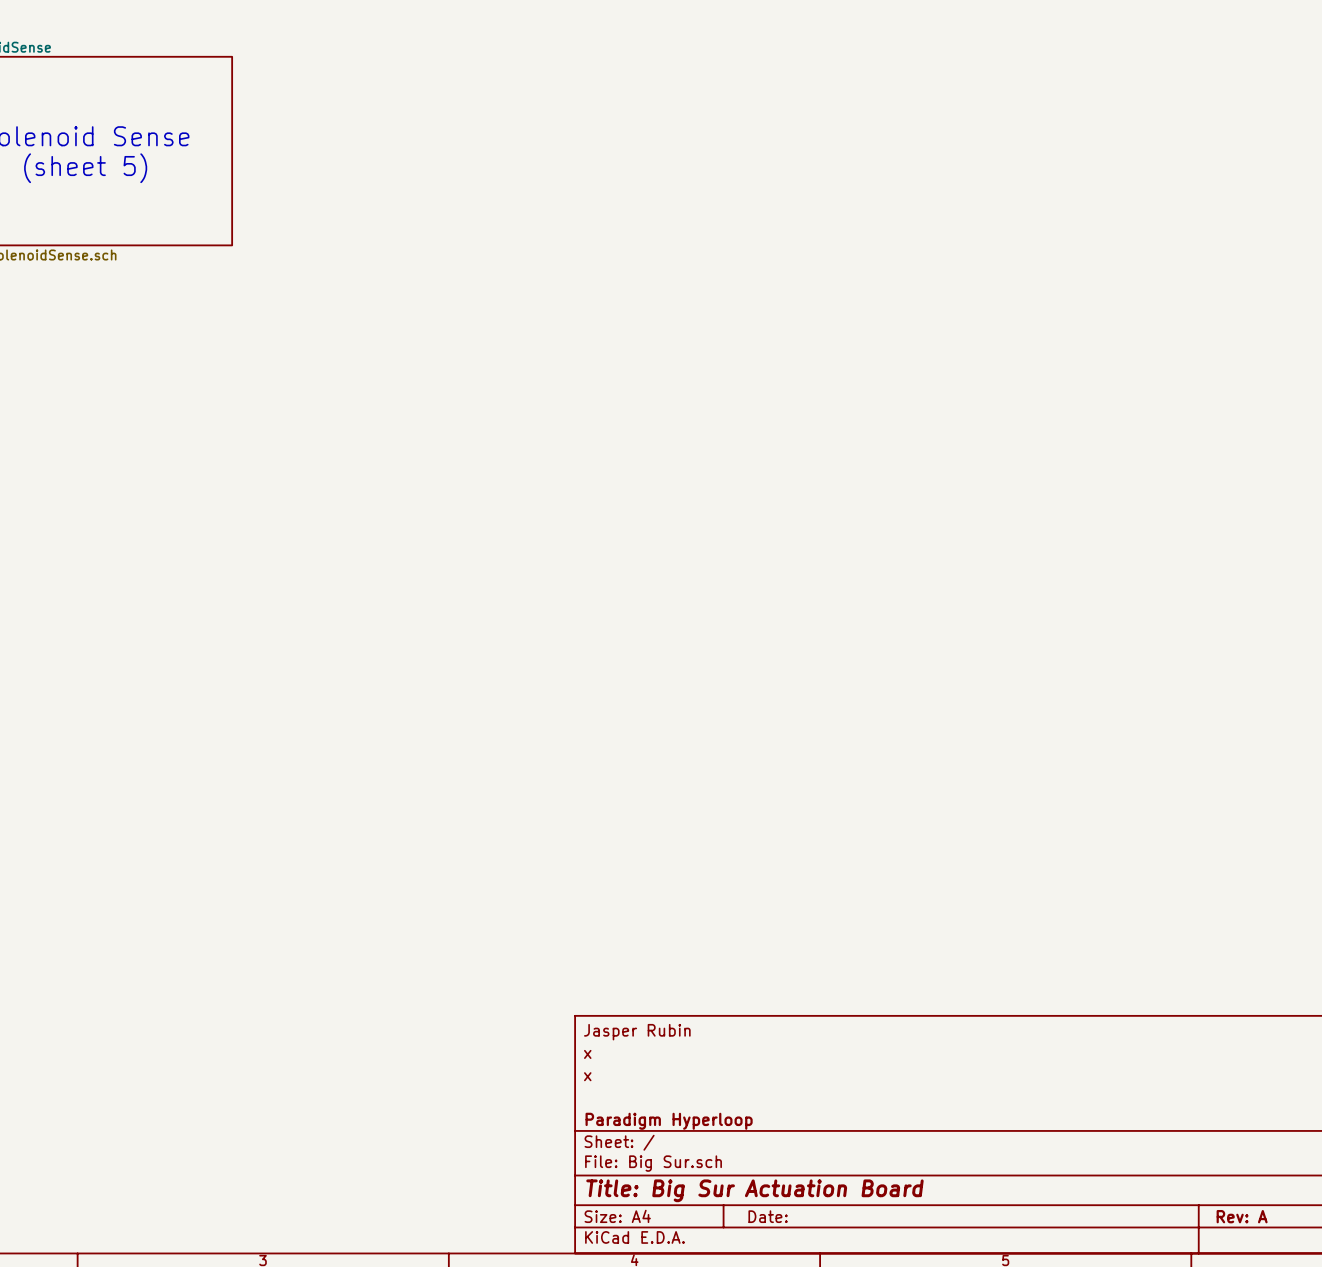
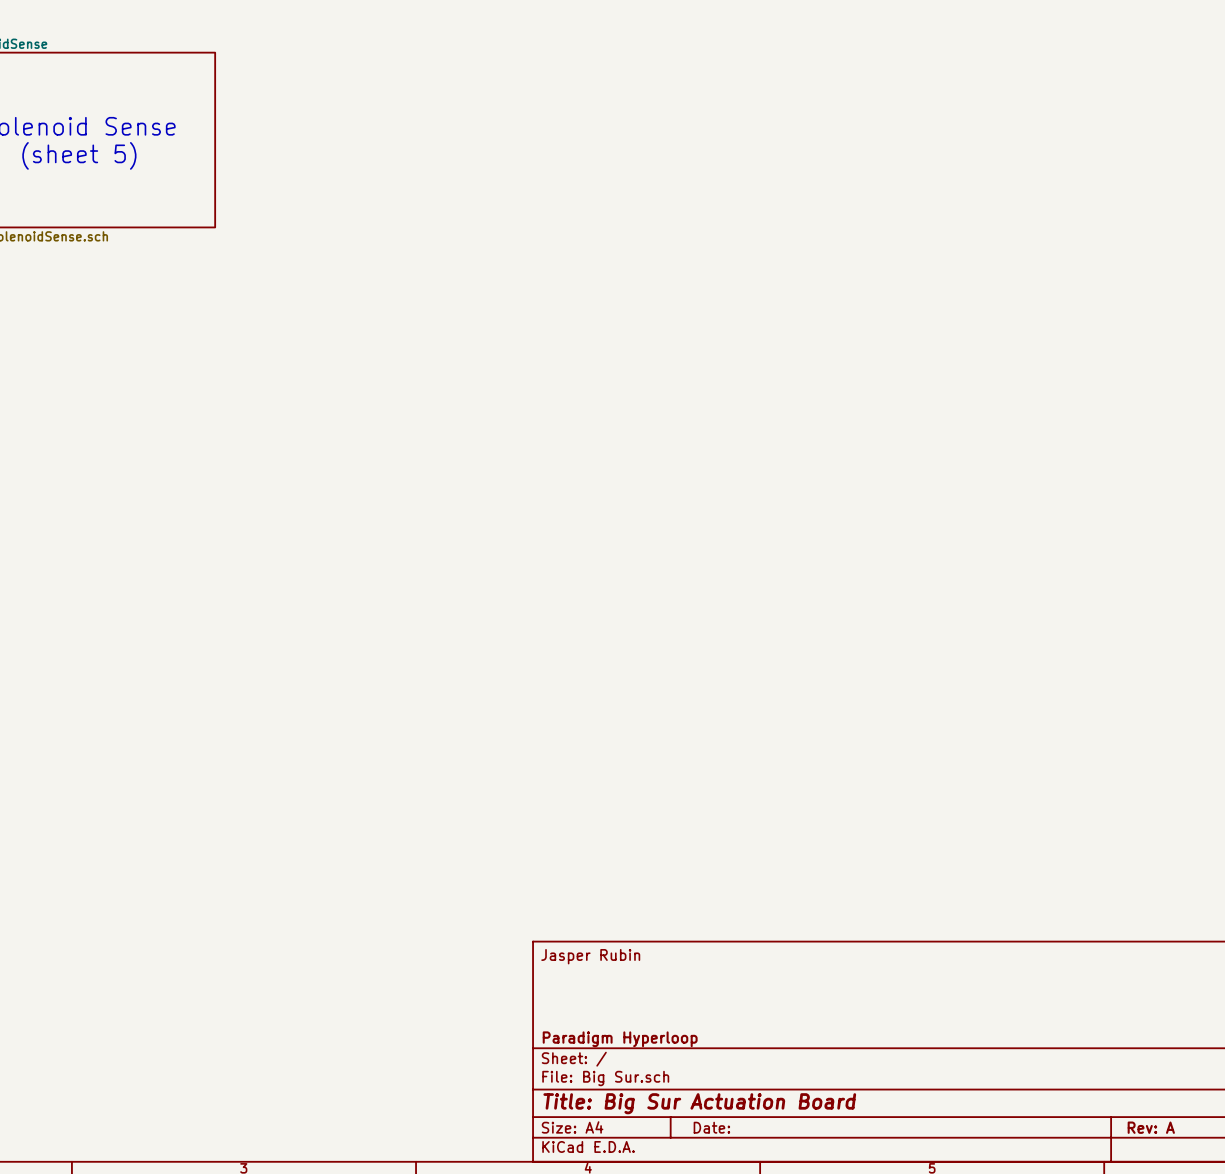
title block: x (587, 1054) -> none
title block: x (587, 1076) -> none

